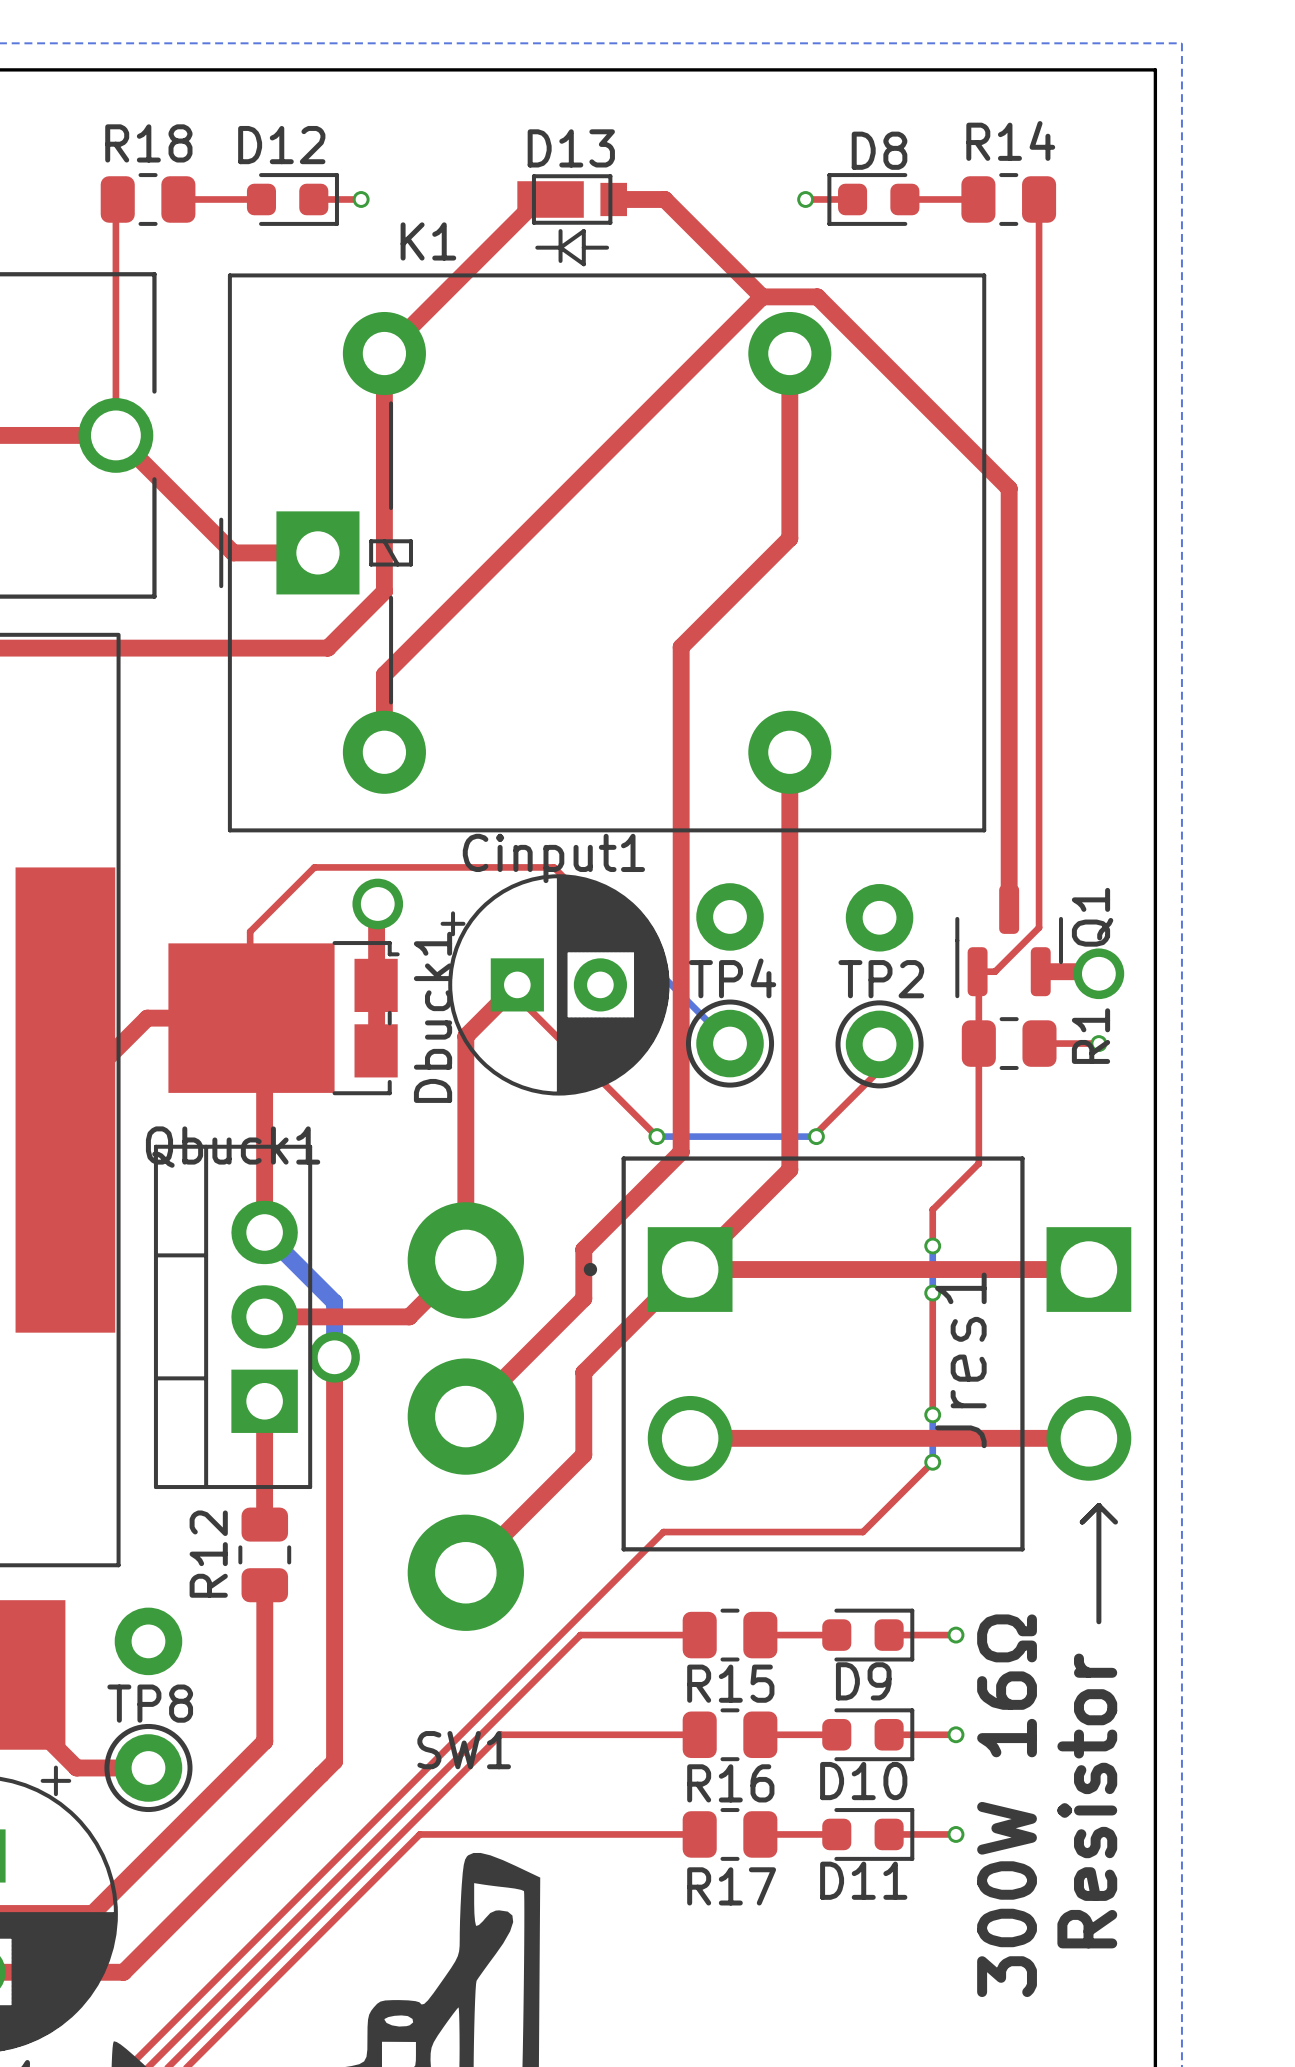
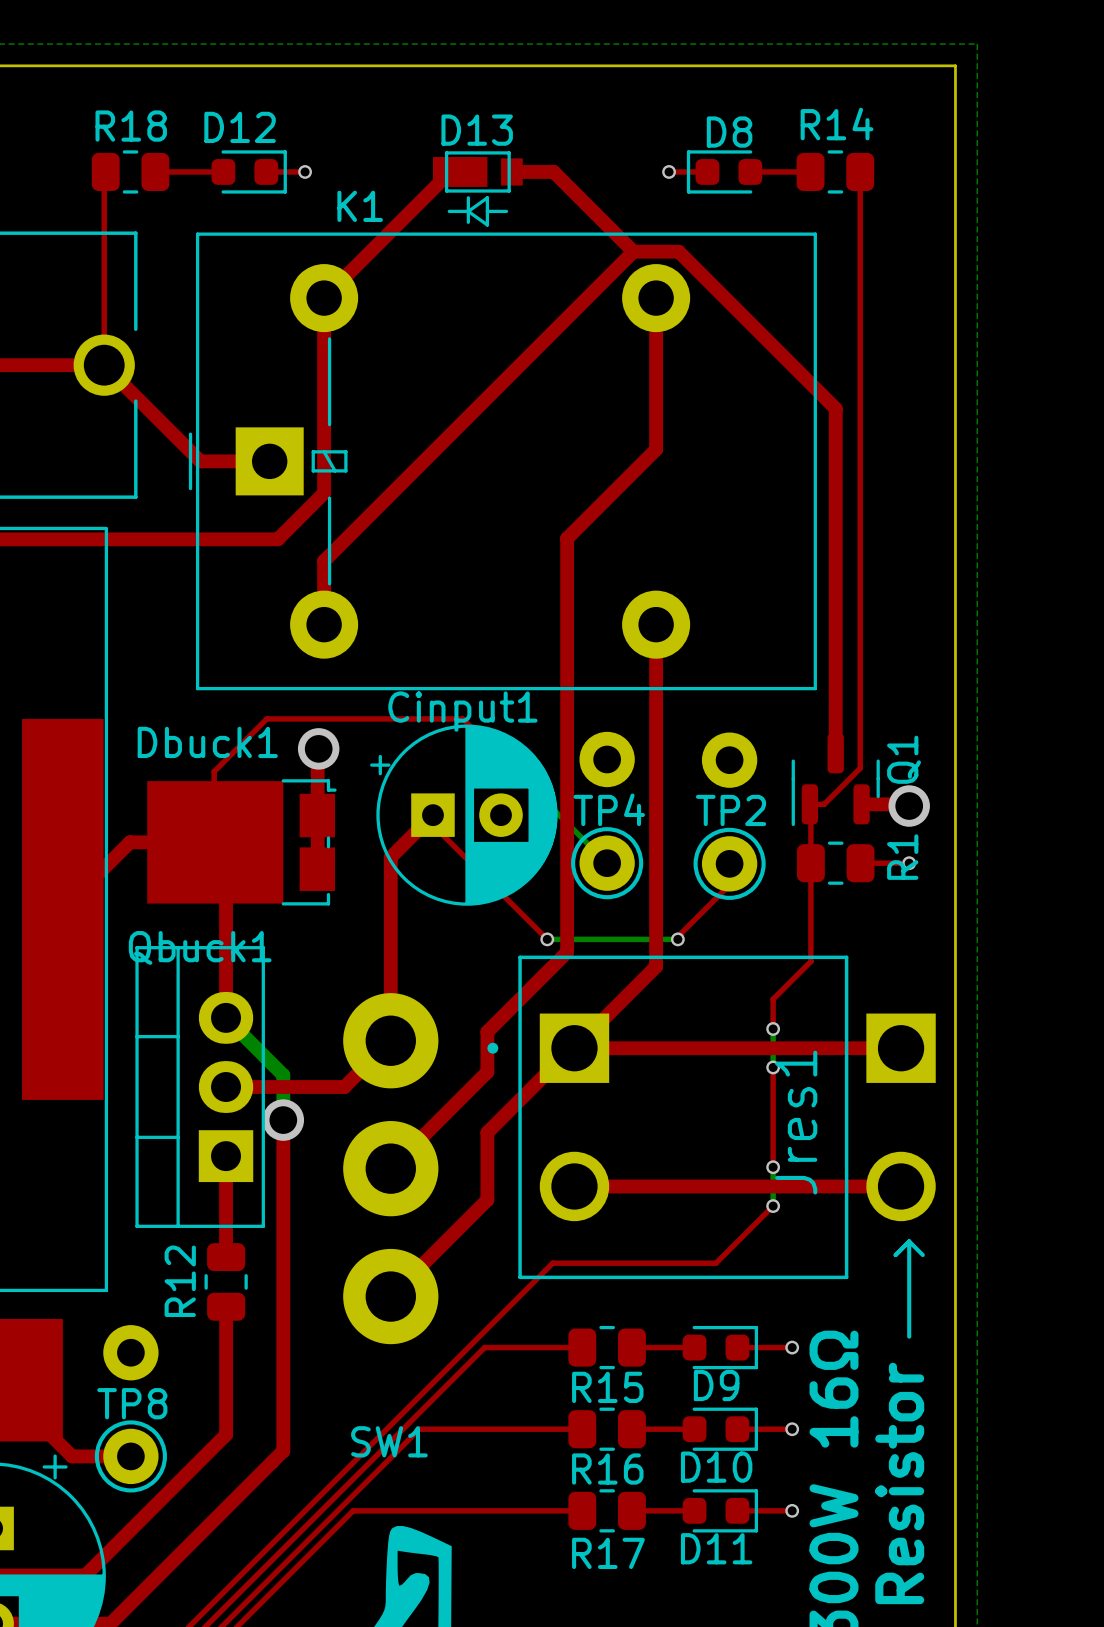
Dbuck1 name rotation: 0° (433, 1017) -> 90° clockwise (207, 742)
Dbuck1 name position: Dbuck1 (433, 1017) -> Dbuck1 (207, 742)

